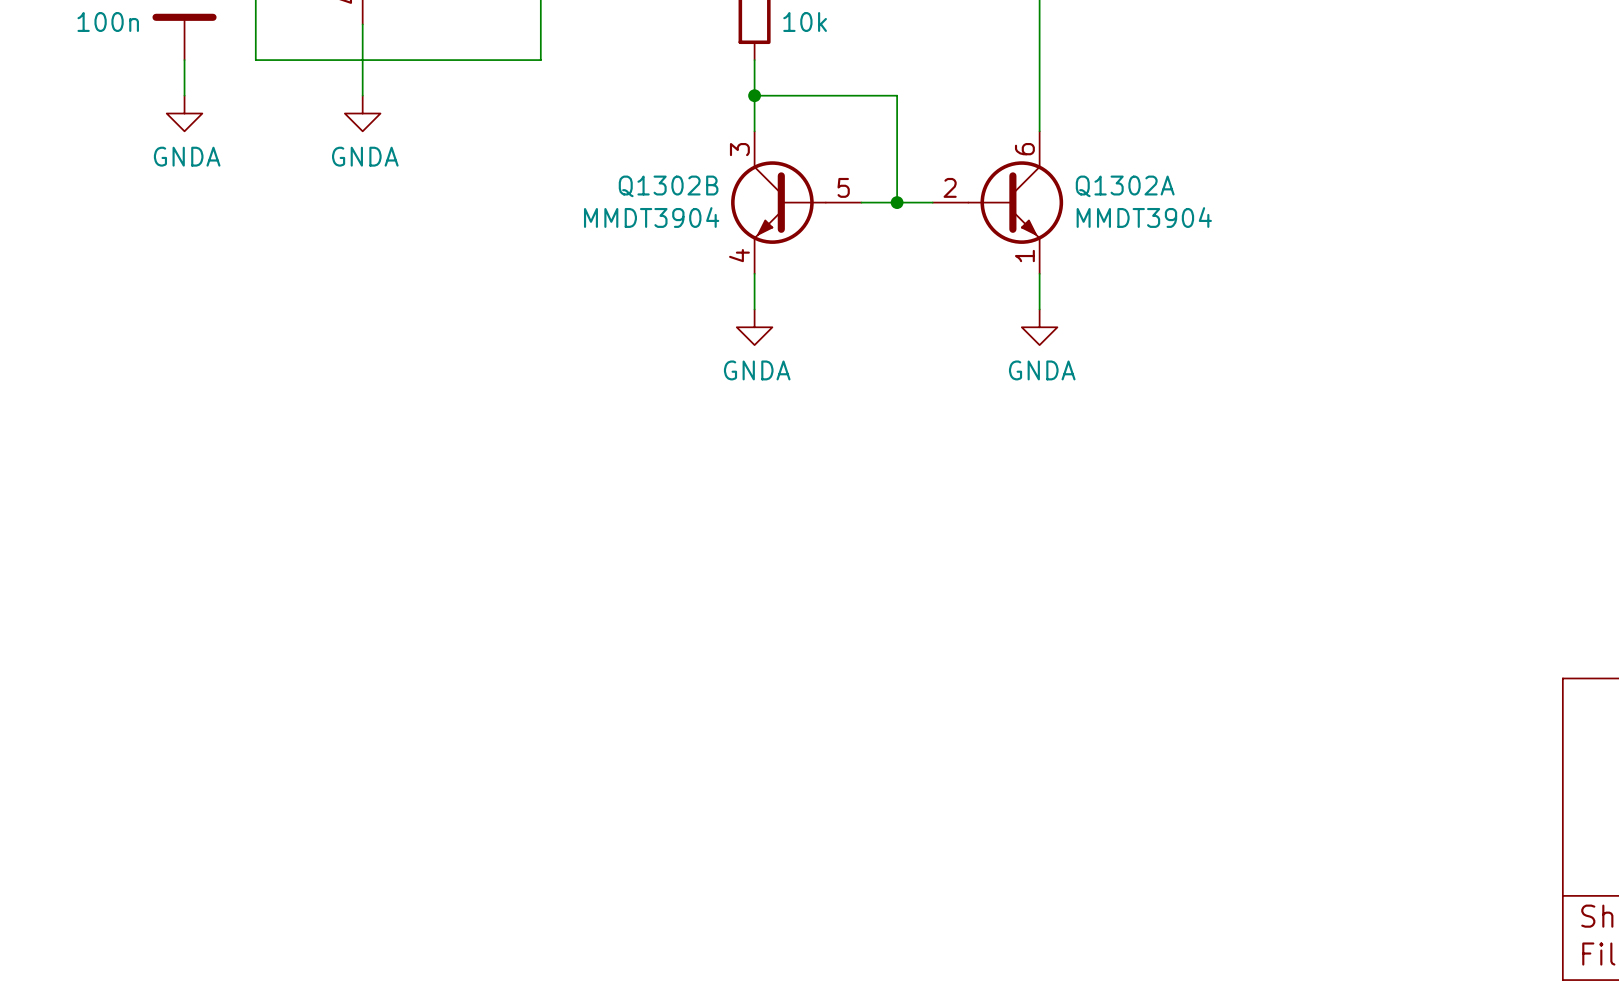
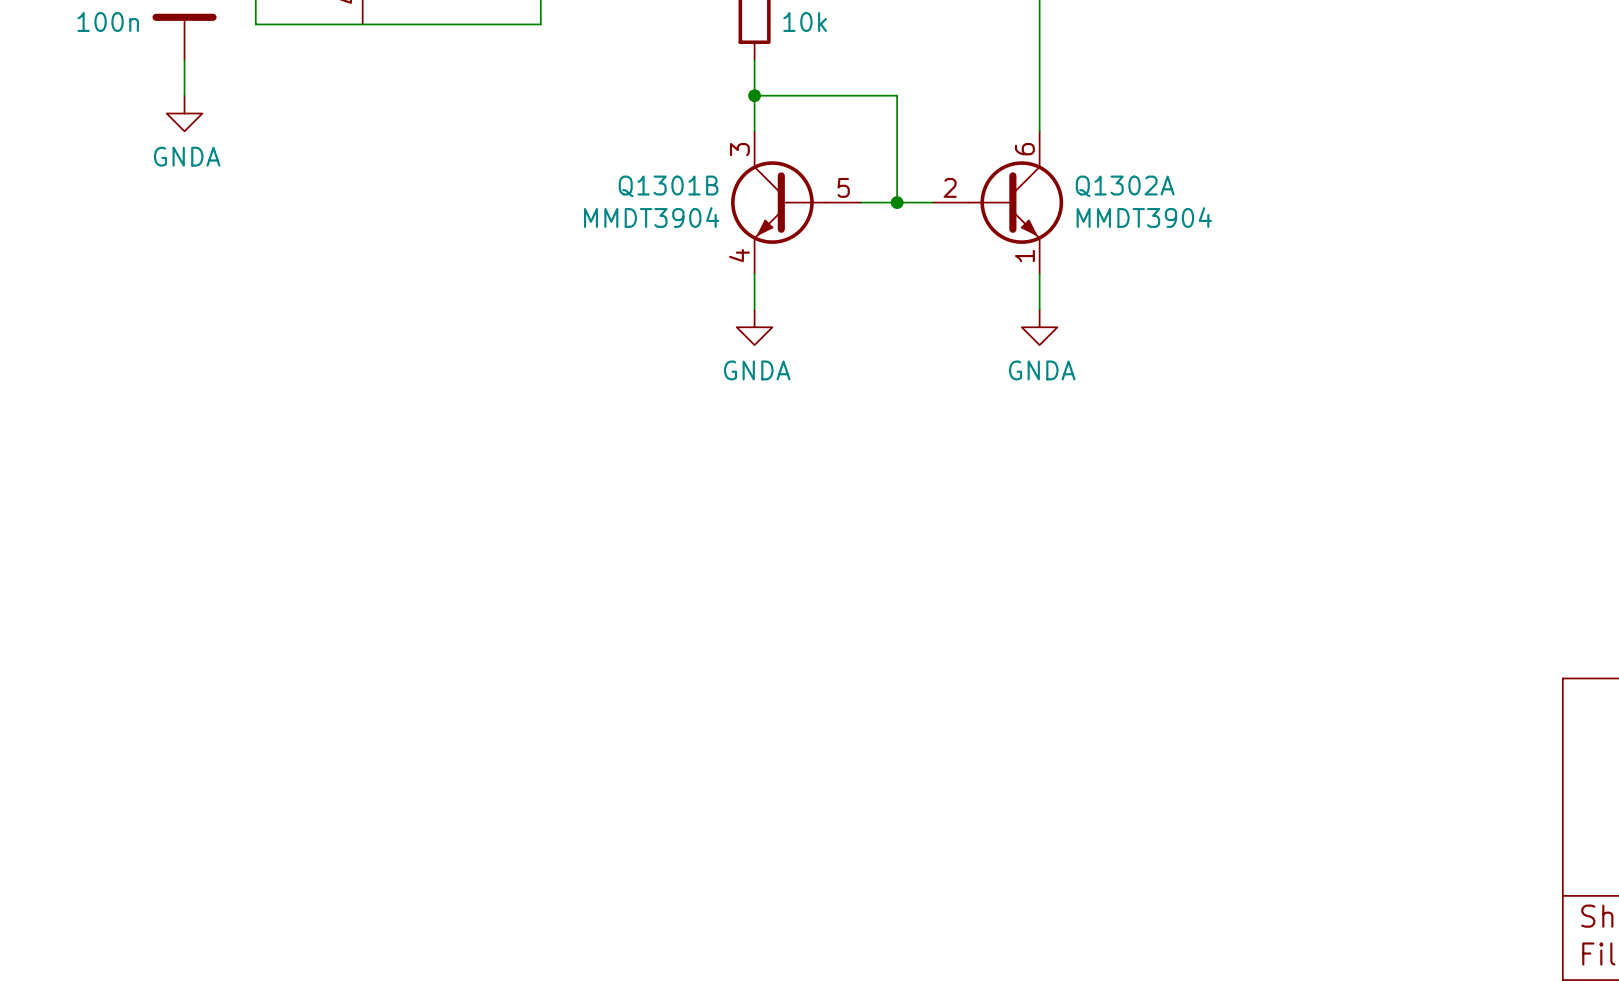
wire: (255, 24) (255, 60) (540, 60) (540, 24) -> (255, 24) (540, 24)
wire: (362, 24) (362, 95) -> none
power symbol: GNDA (362, 113) -> none
Q1302B name: Q1302B (668, 186) -> Q1301B (668, 186)

